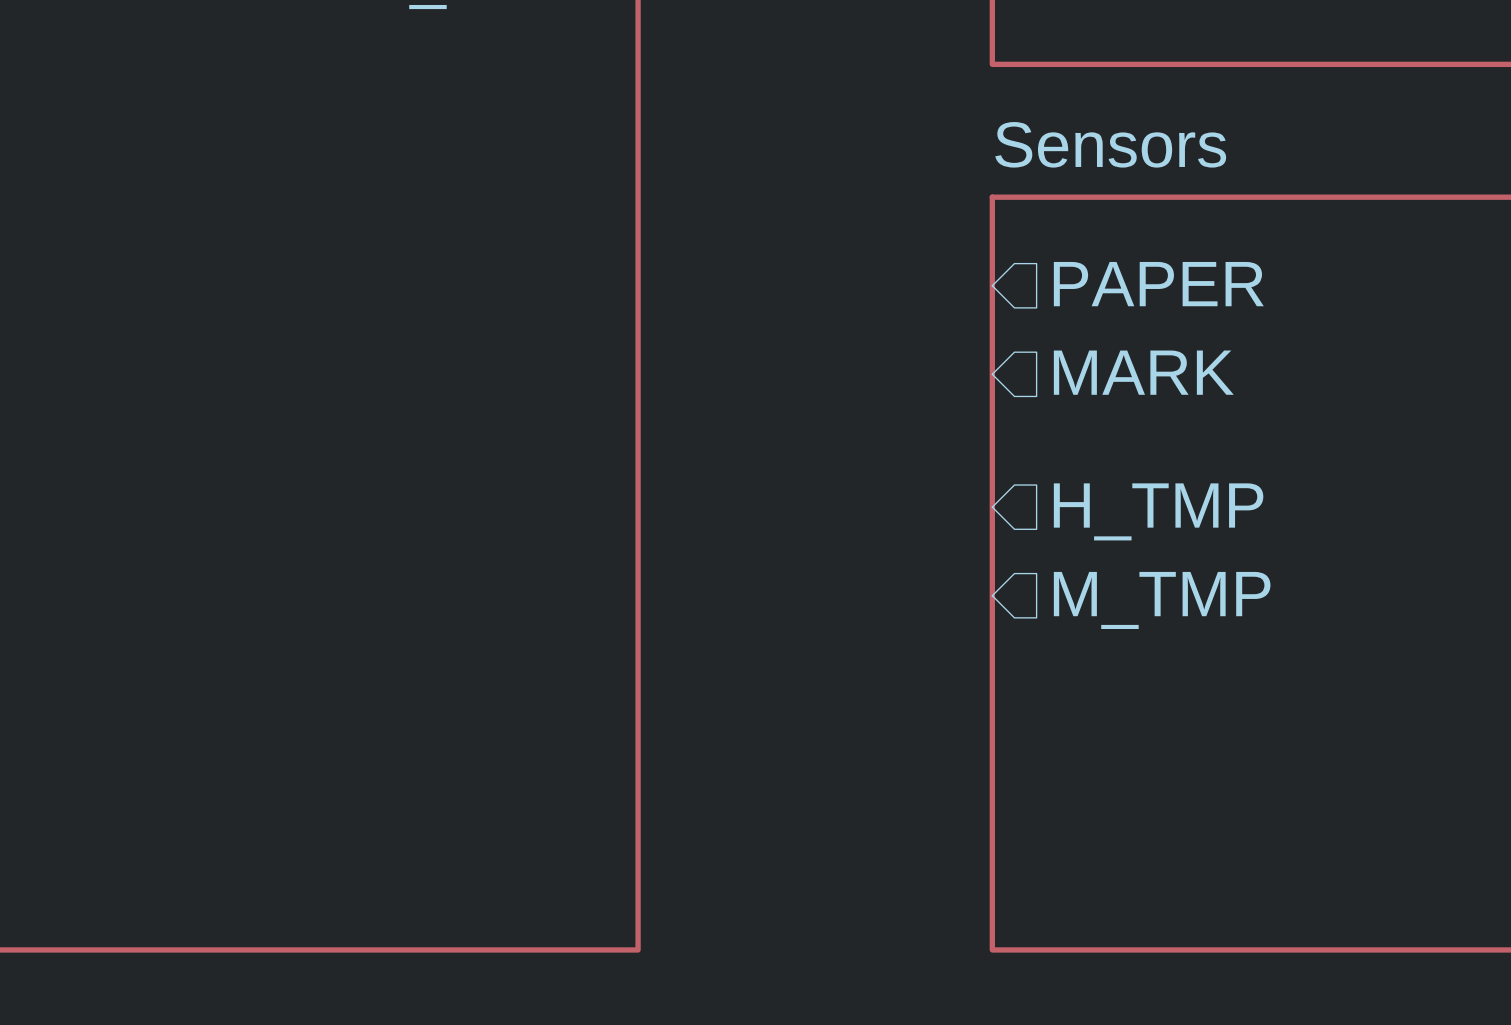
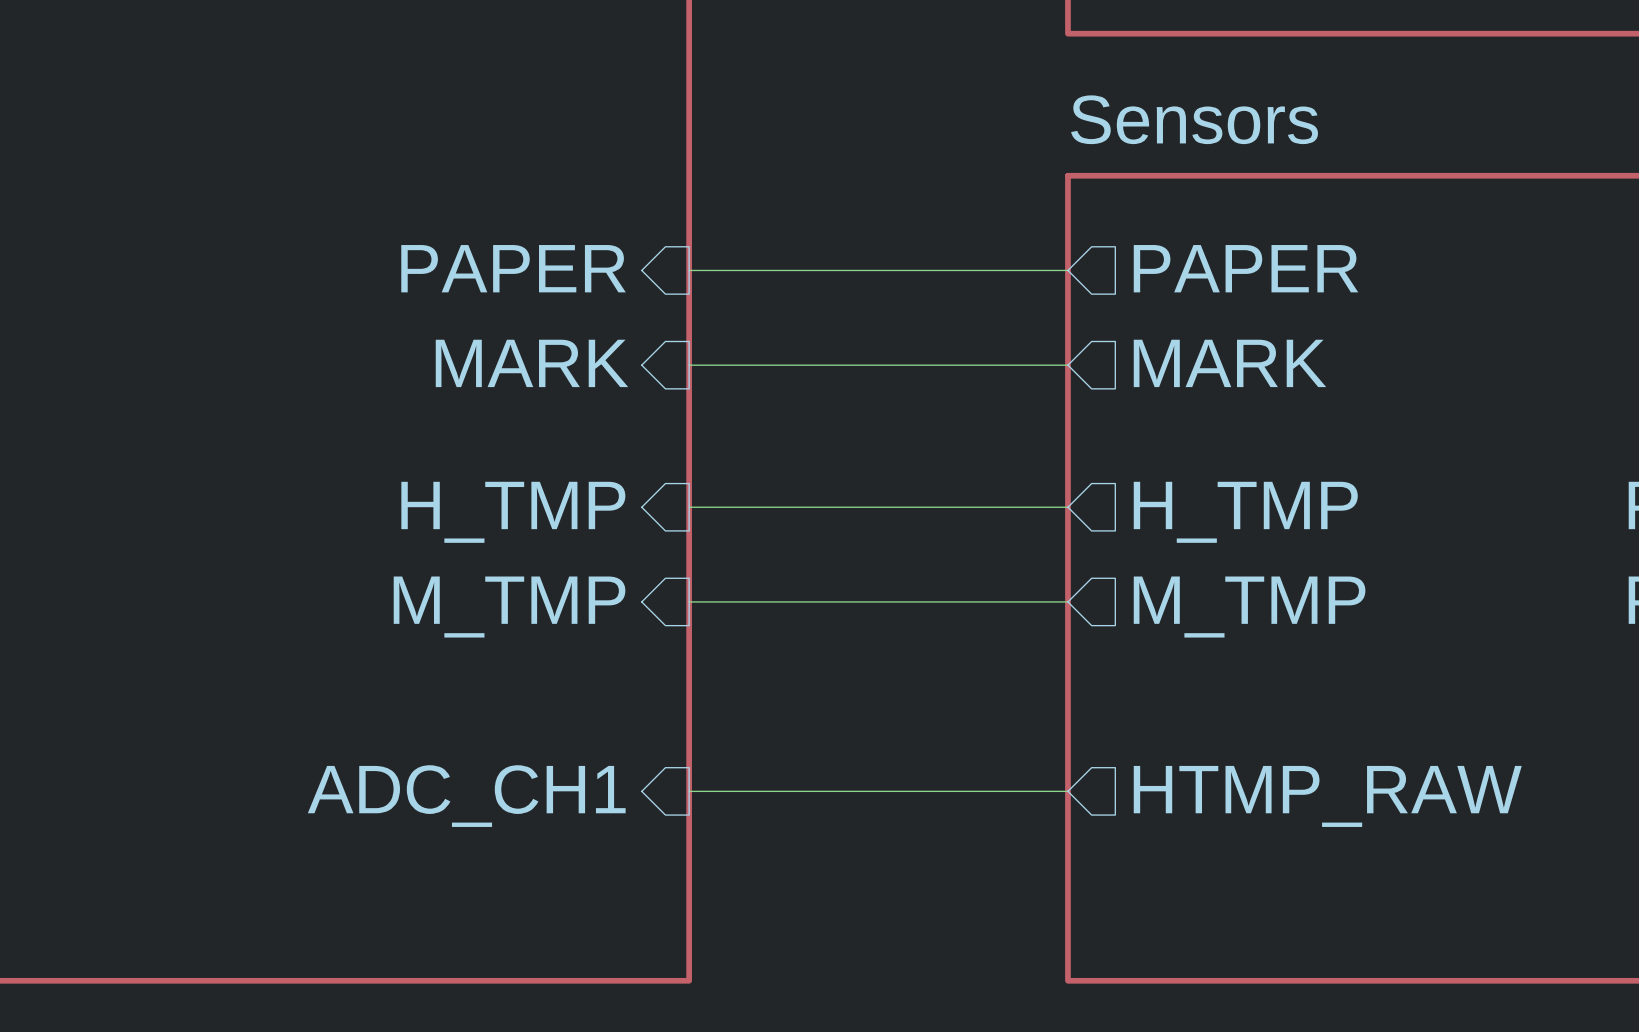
sheet pin: none -> PAPER (513, 268)
wire: none -> (689, 270) (1067, 270)
sheet pin: none -> MARK (531, 363)
wire: none -> (689, 365) (1067, 365)
wire: none -> (689, 507) (1067, 507)
sheet pin: none -> H_TMP (513, 512)
wire: none -> (689, 601) (1067, 601)
sheet pin: none -> M_TMP (509, 607)
wire: none -> (689, 791) (1067, 791)
sheet pin: none -> ADC_CH1 (466, 796)
sheet pin: none -> HTMP_RAW (1327, 796)

